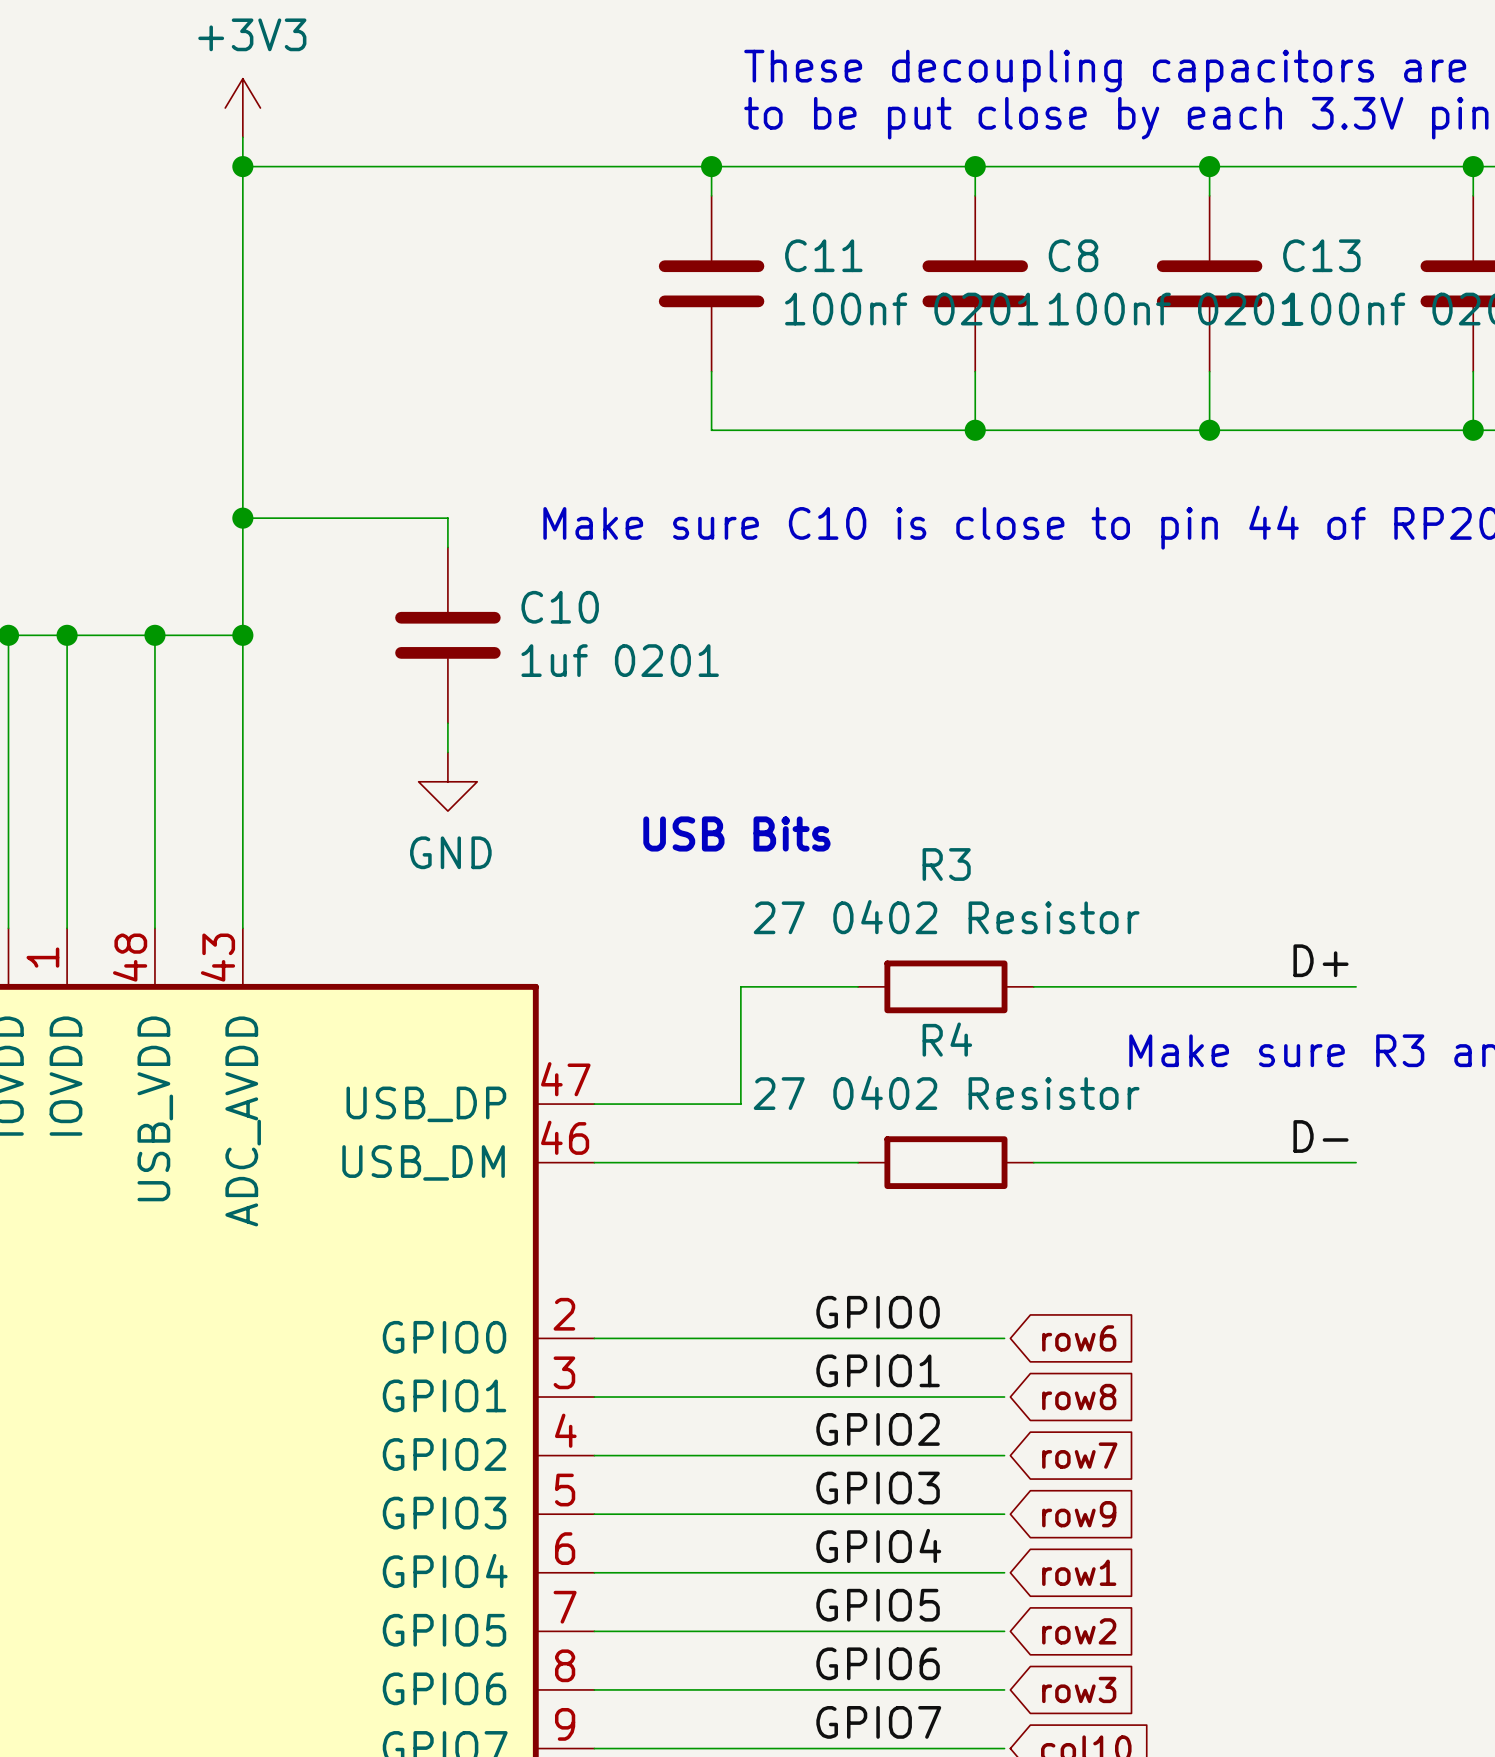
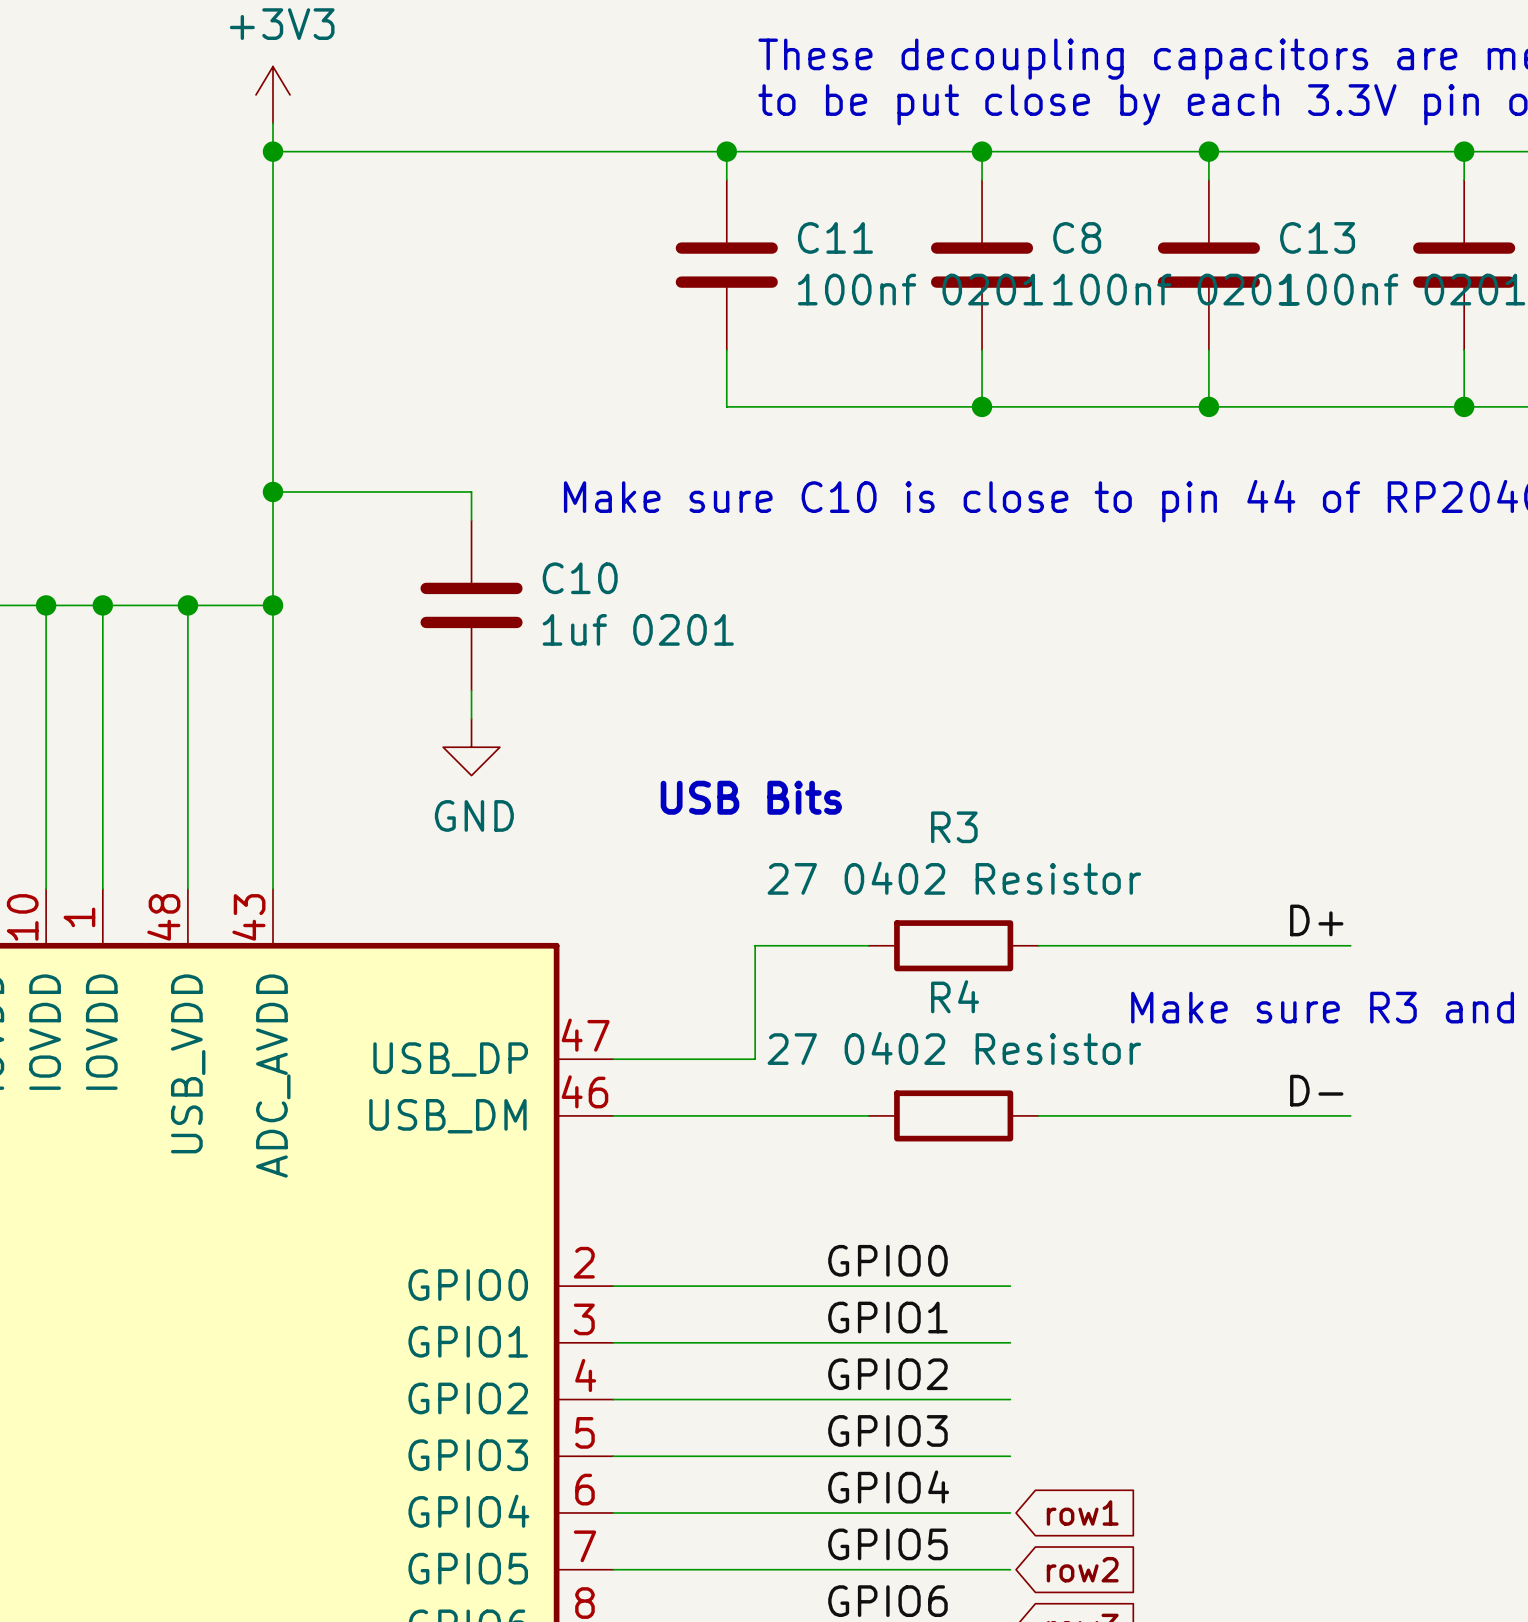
global label: row6 (1079, 1338) -> none
global label: row8 (1079, 1397) -> none
global label: row7 (1079, 1455) -> none
global label: row9 (1079, 1514) -> none

